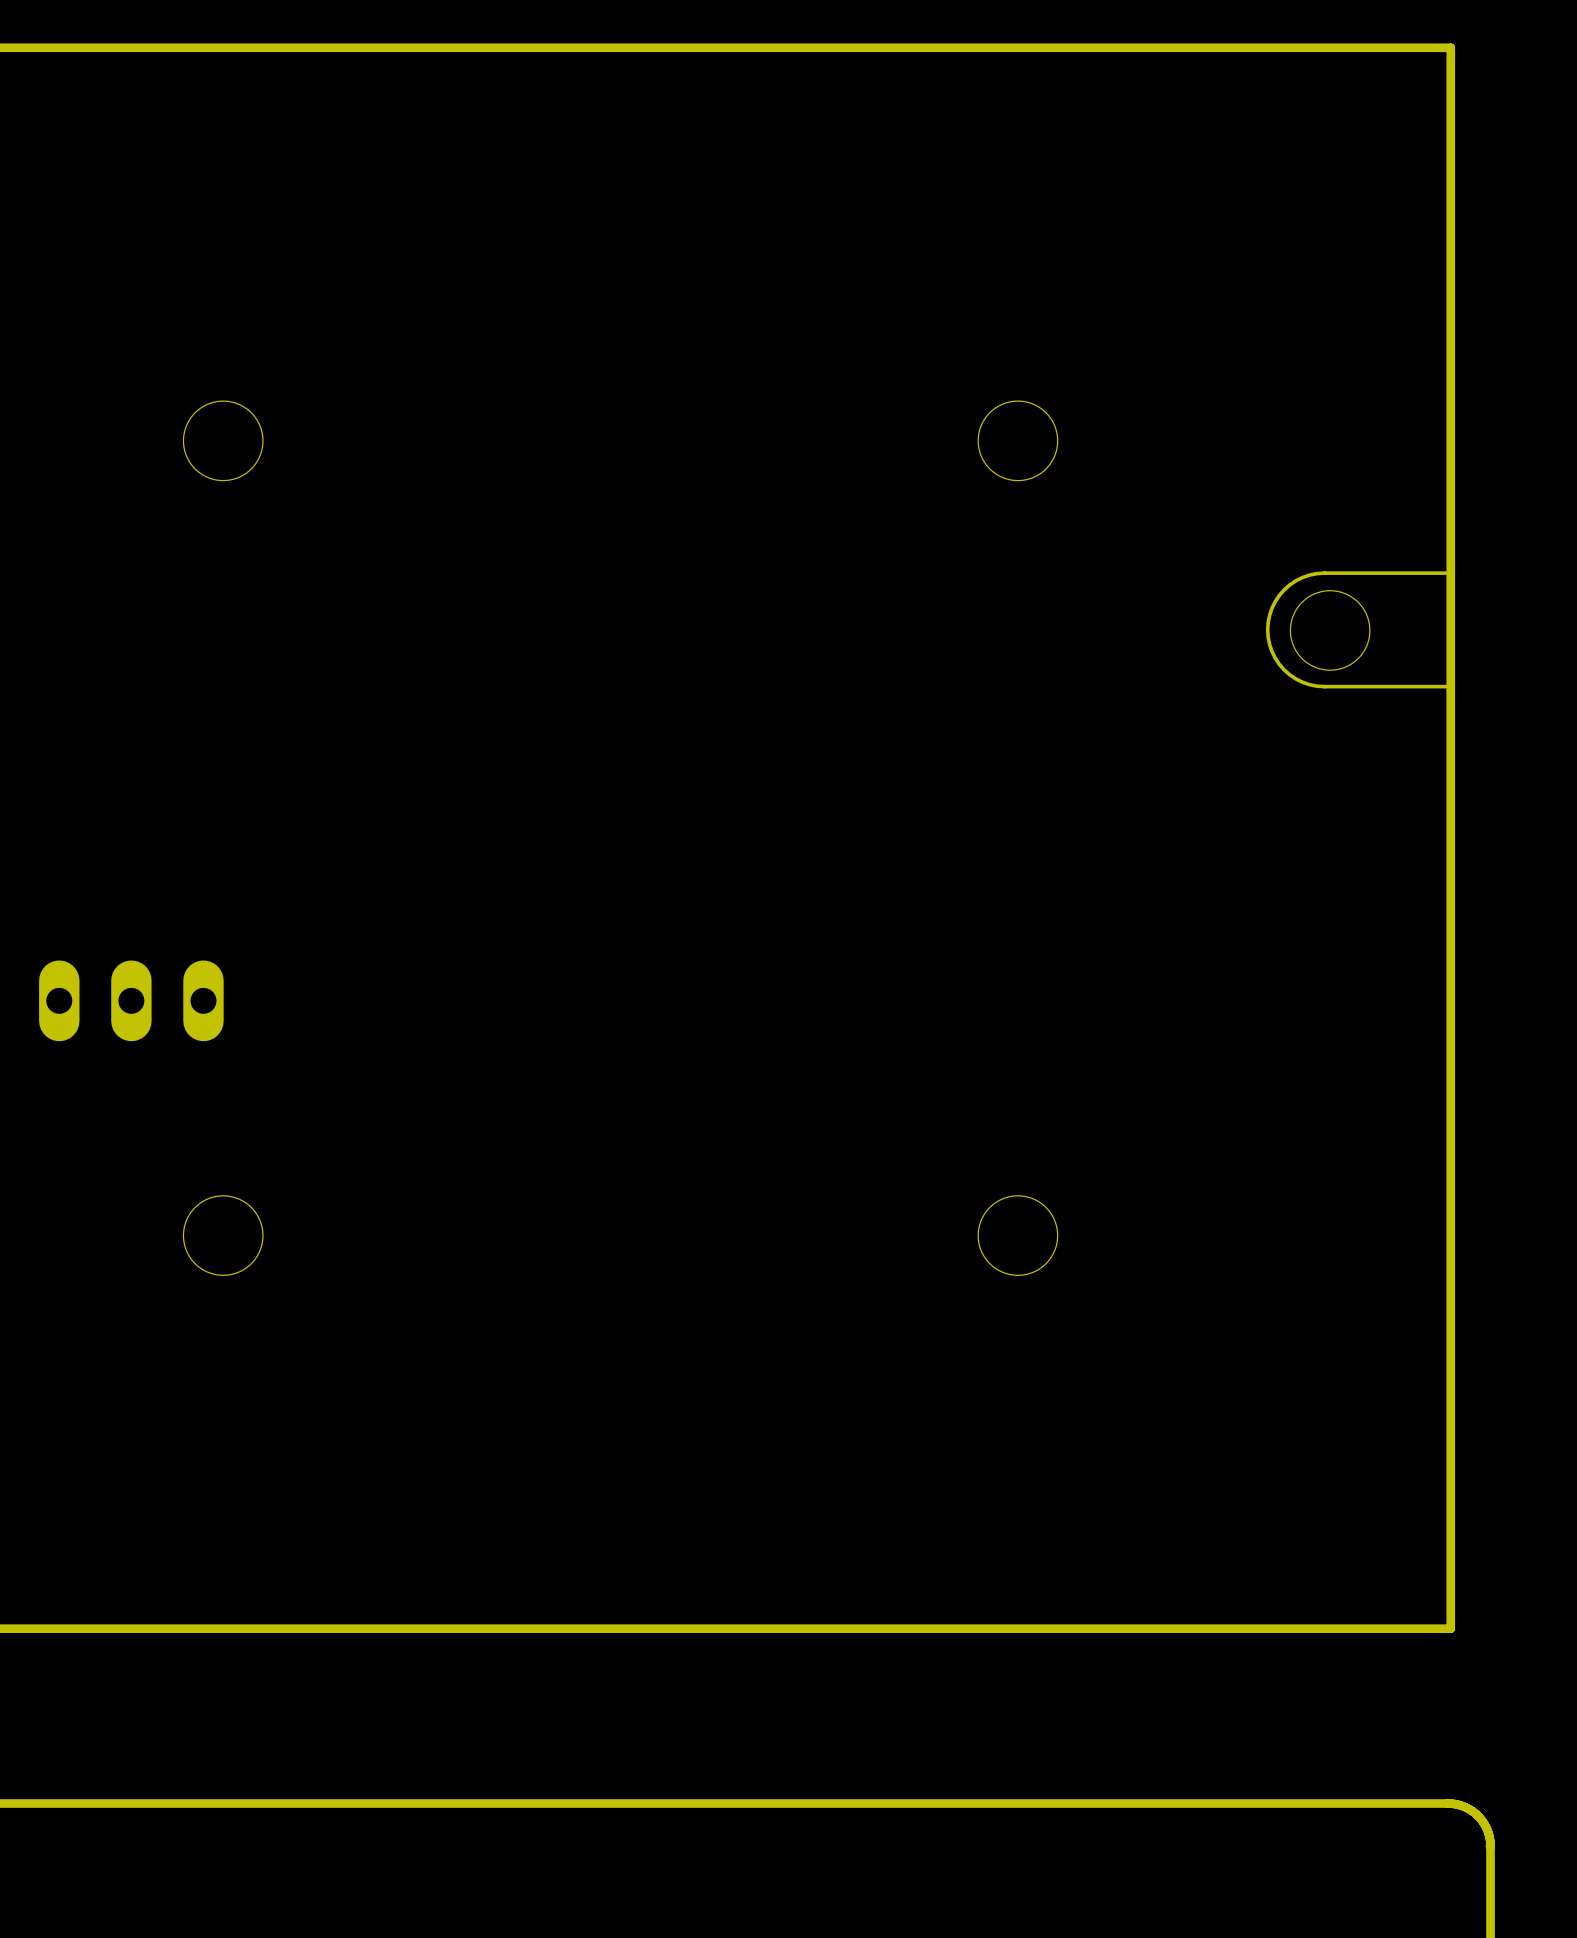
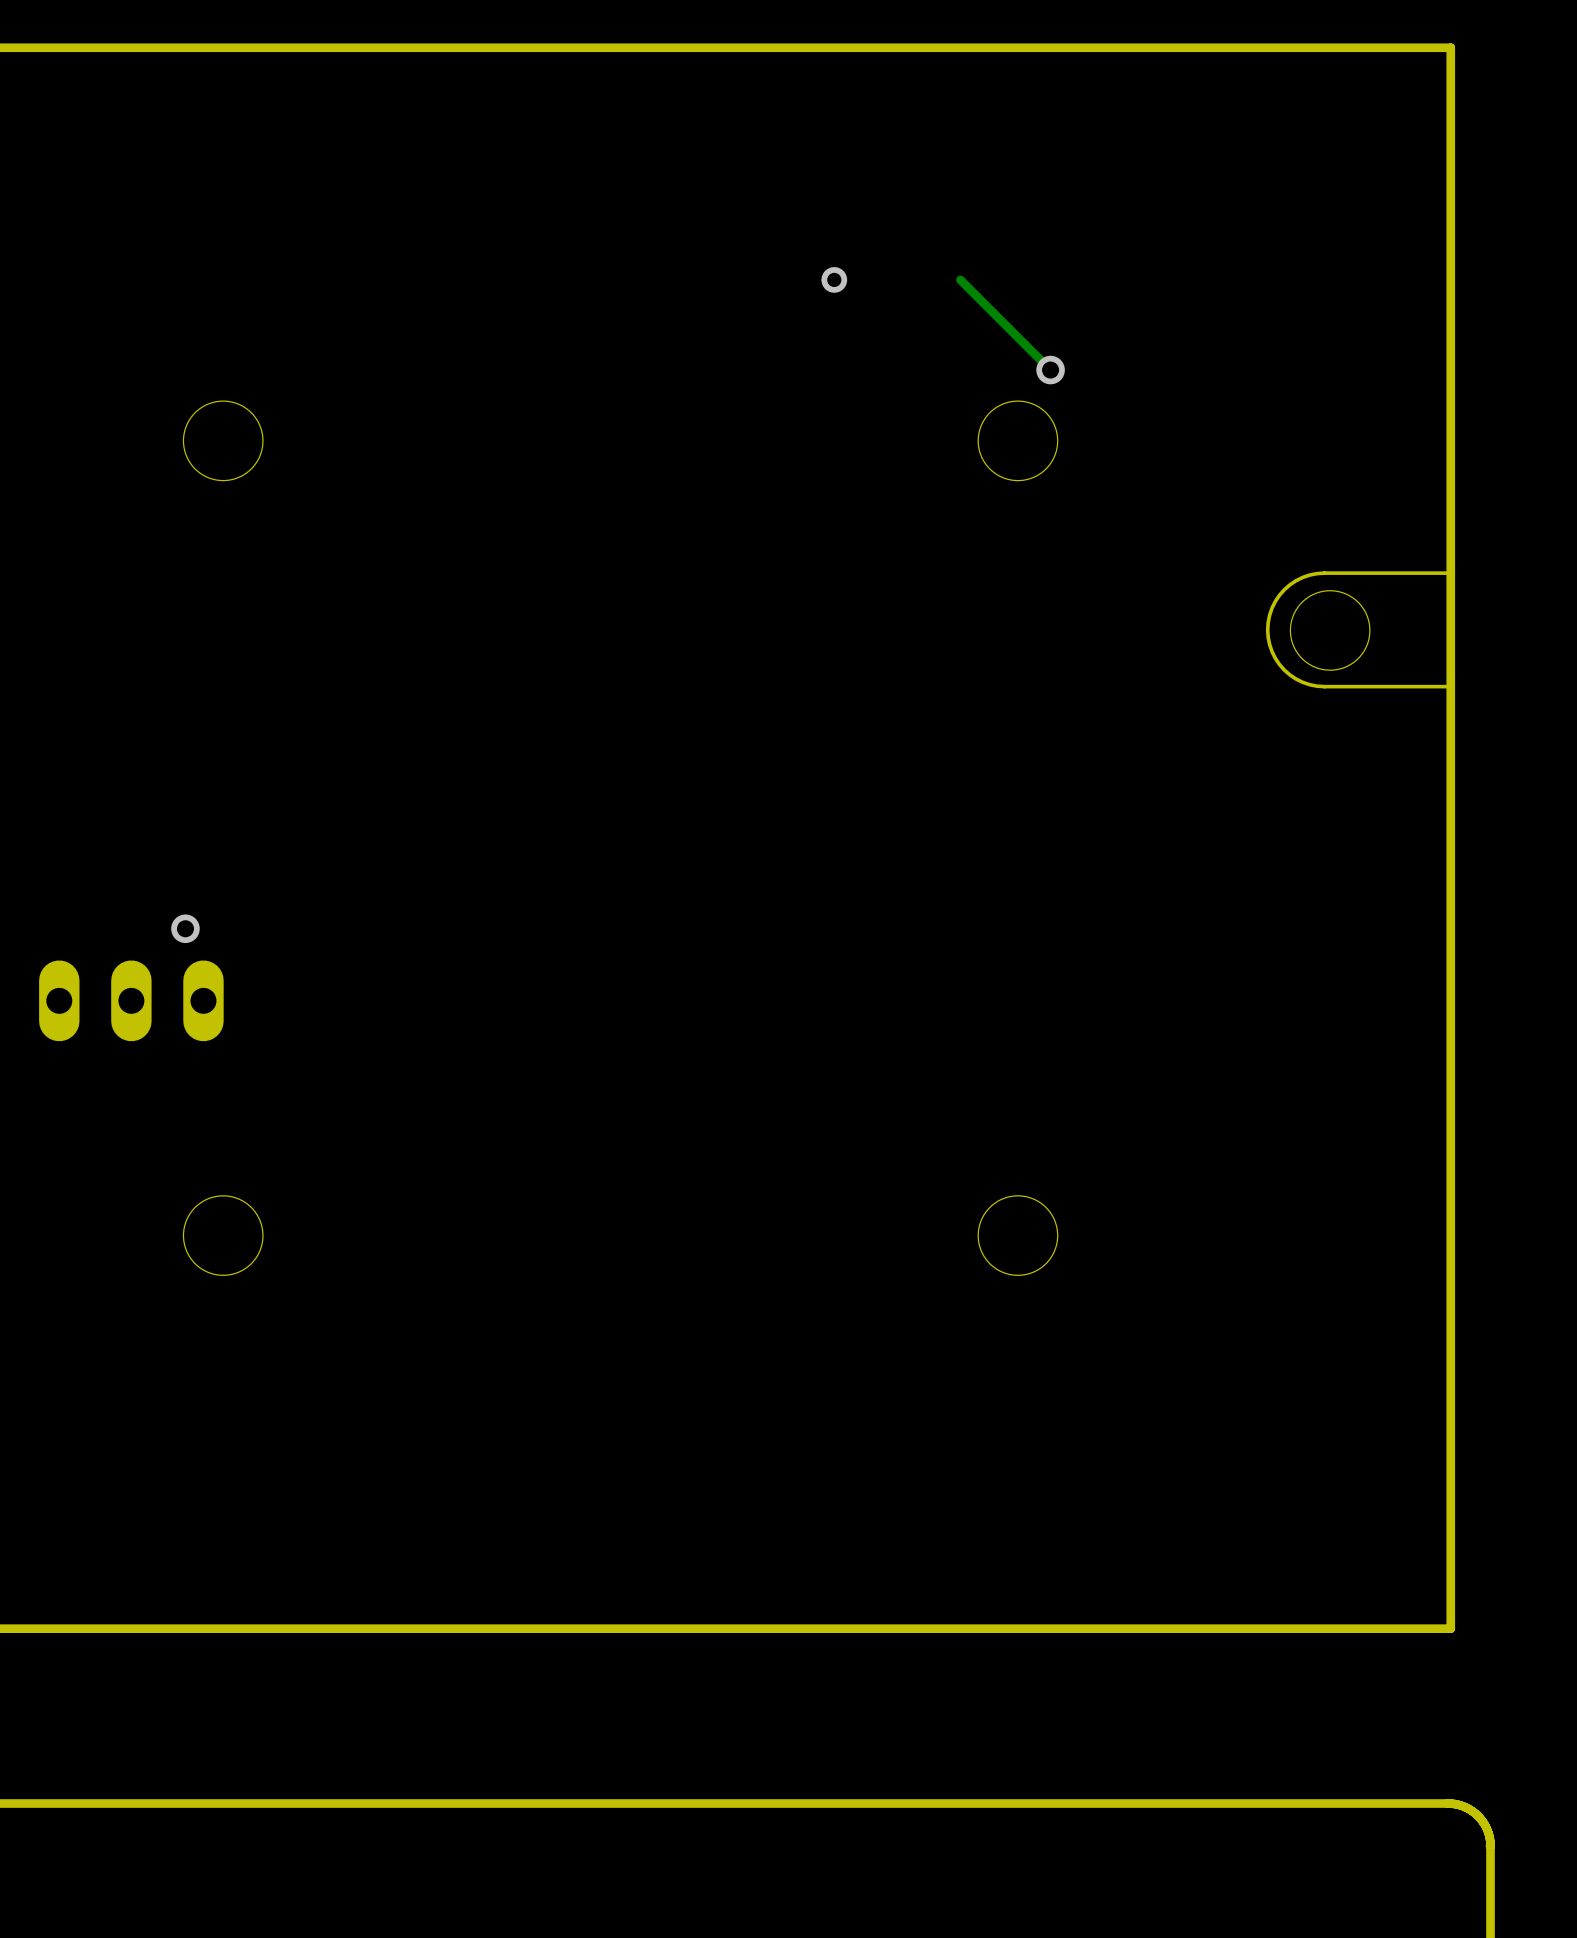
via: none -> (834, 279)
track: none -> (960, 279) (1050, 370)
via: none -> (1050, 370)
via: none -> (185, 928)

